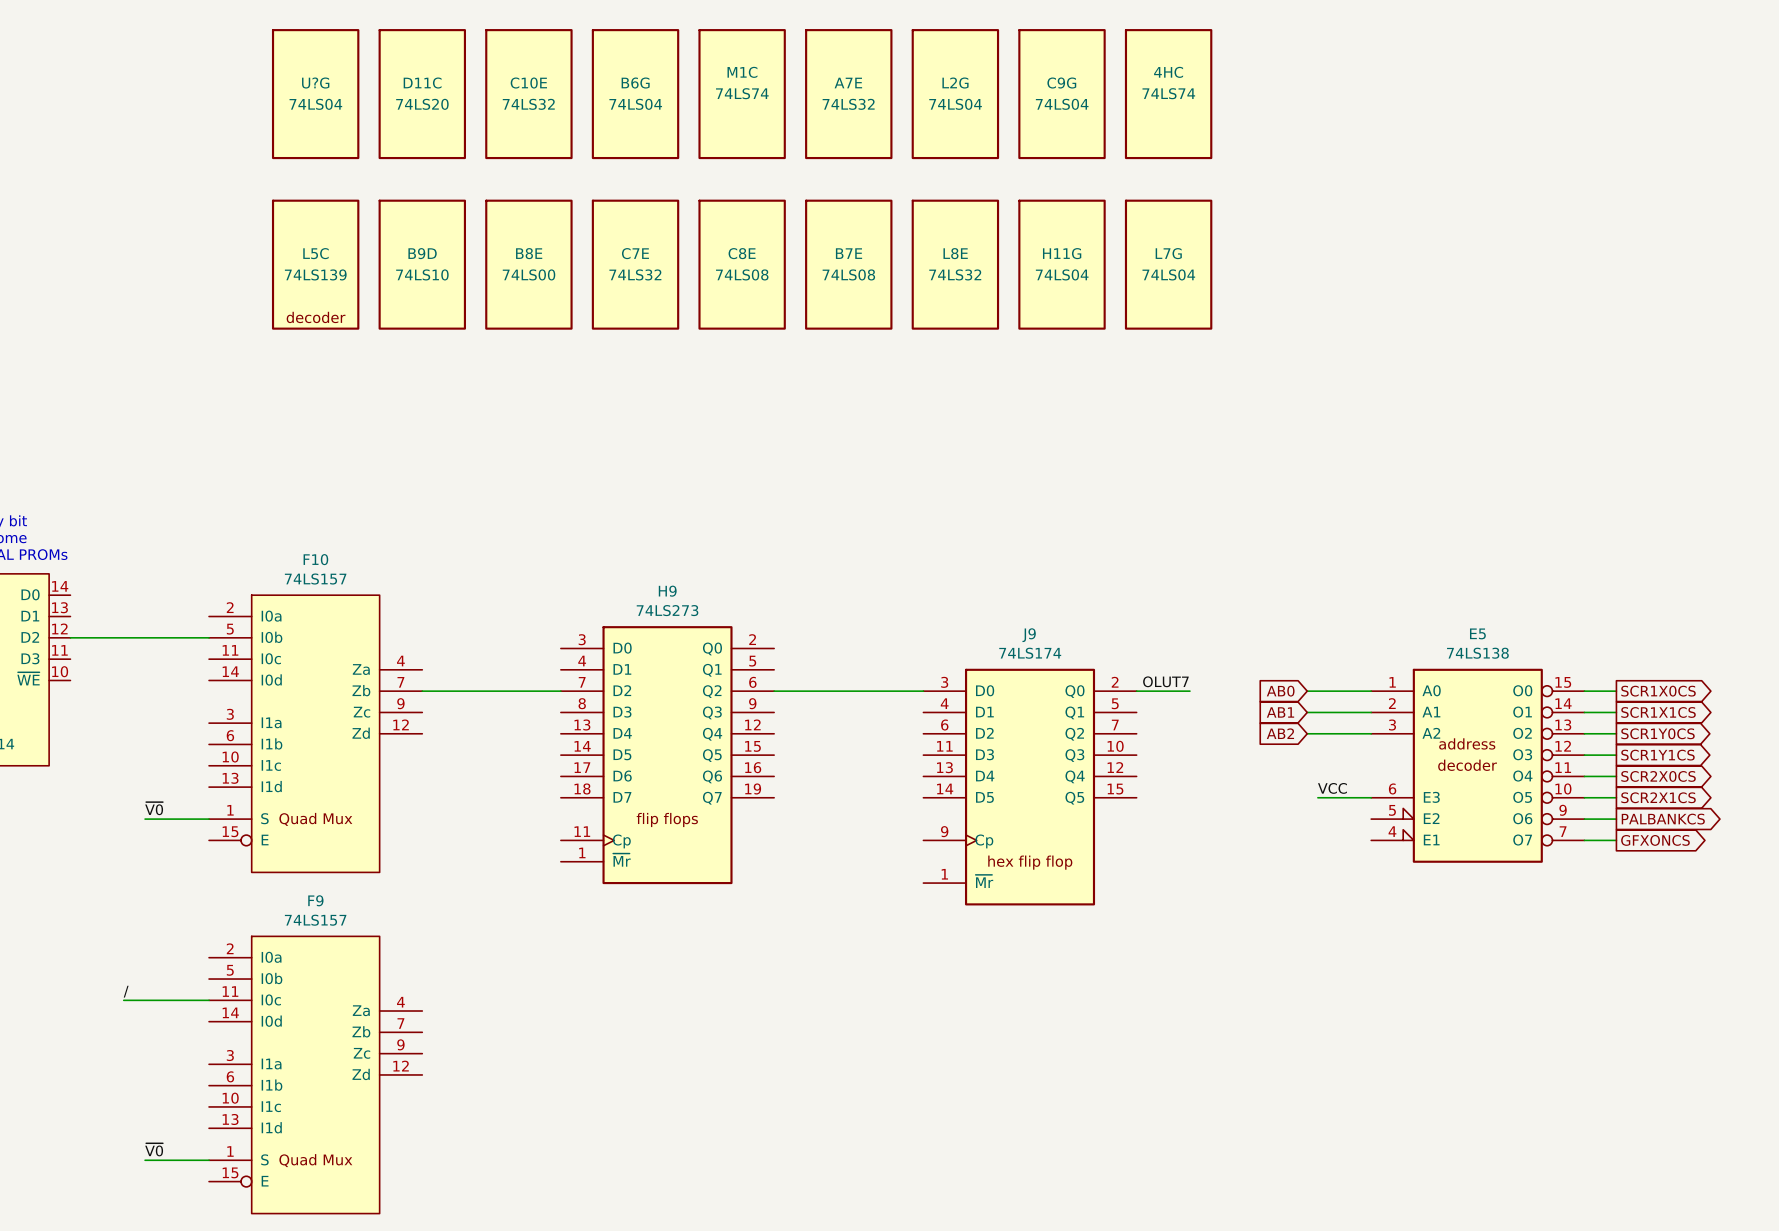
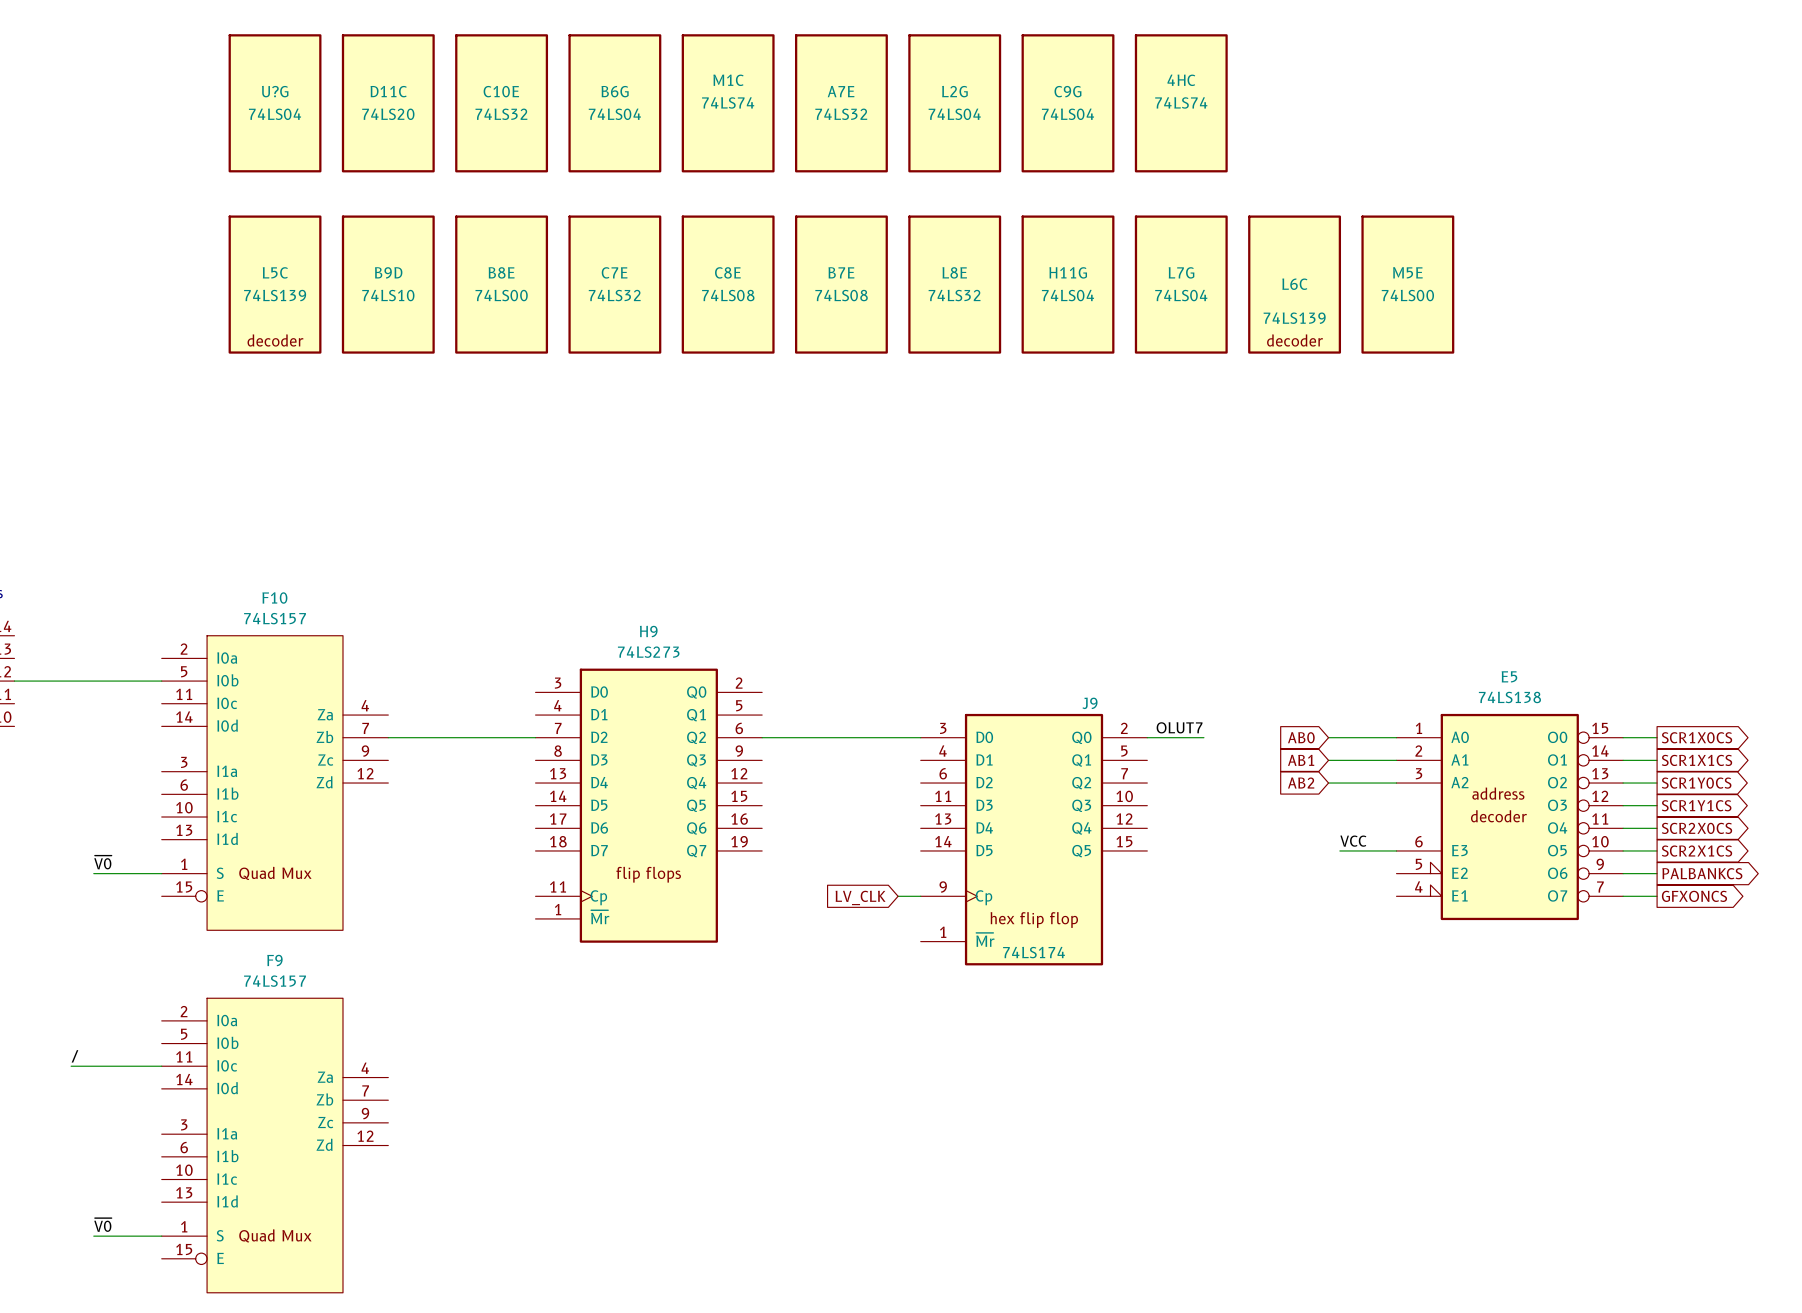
L6C: none -> 74LS139 (1294, 284)
M5E: none -> 74LS00 (1407, 284)
J9 name position: J9 (1029, 635) -> J9 (1089, 703)
J9 value position: 74LS174 (1030, 653) -> 74LS174 (1034, 952)
wire: none -> (898, 896) (920, 896)
global label: none -> LV_CLK (860, 897)

